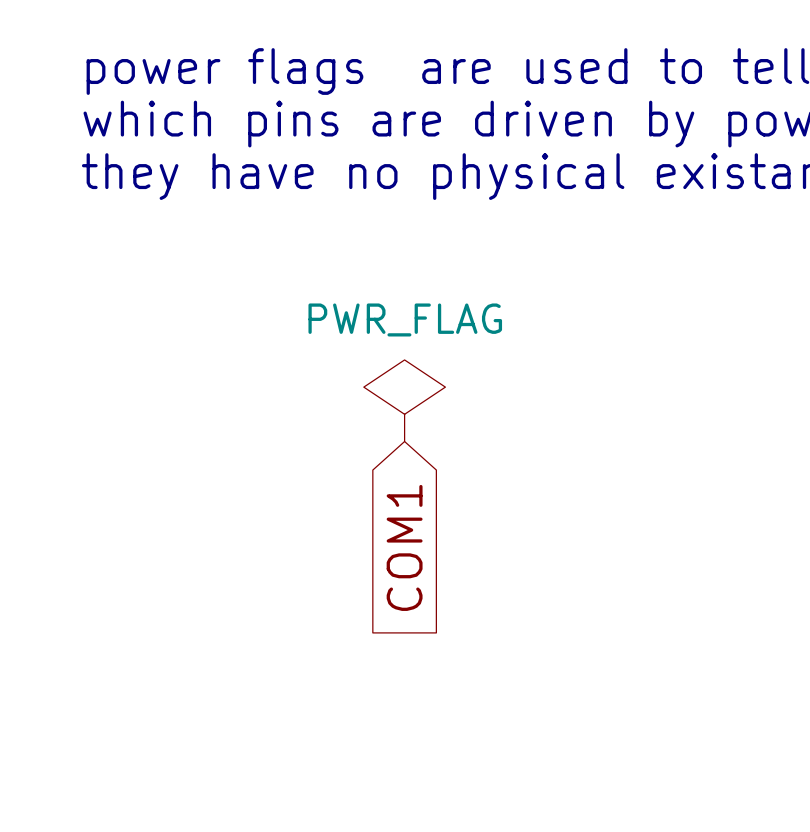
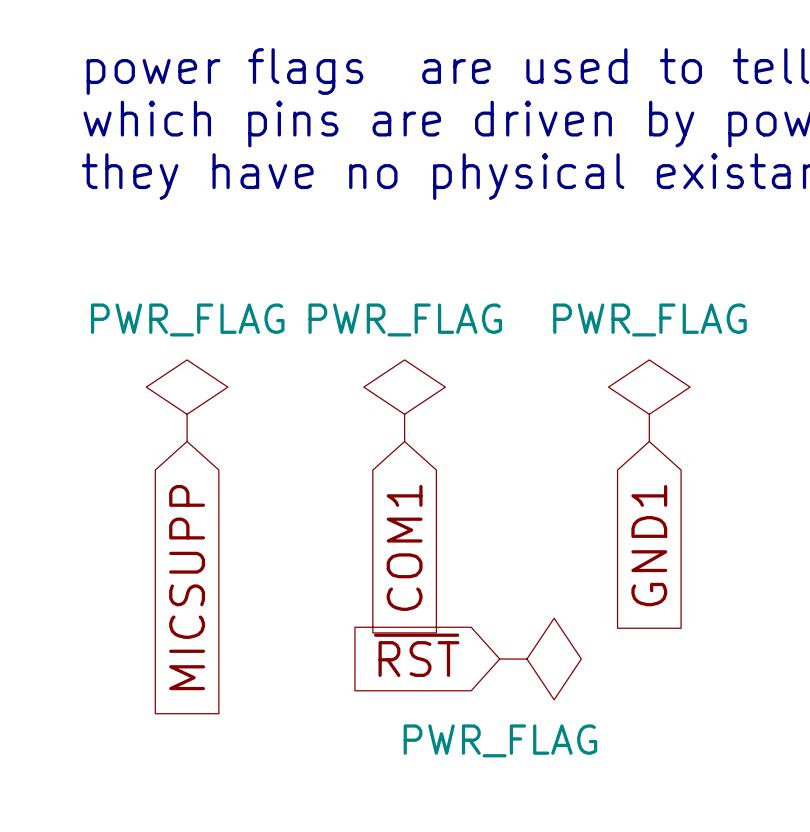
power symbol: none -> PWR_FLAG (187, 400)
power symbol: none -> PWR_FLAG (649, 400)
global label: none -> GND1 (649, 545)
global label: none -> MICSUPP (187, 587)
global label: none -> ~{RST} (416, 655)
power symbol: none -> PWR_FLAG (540, 659)

